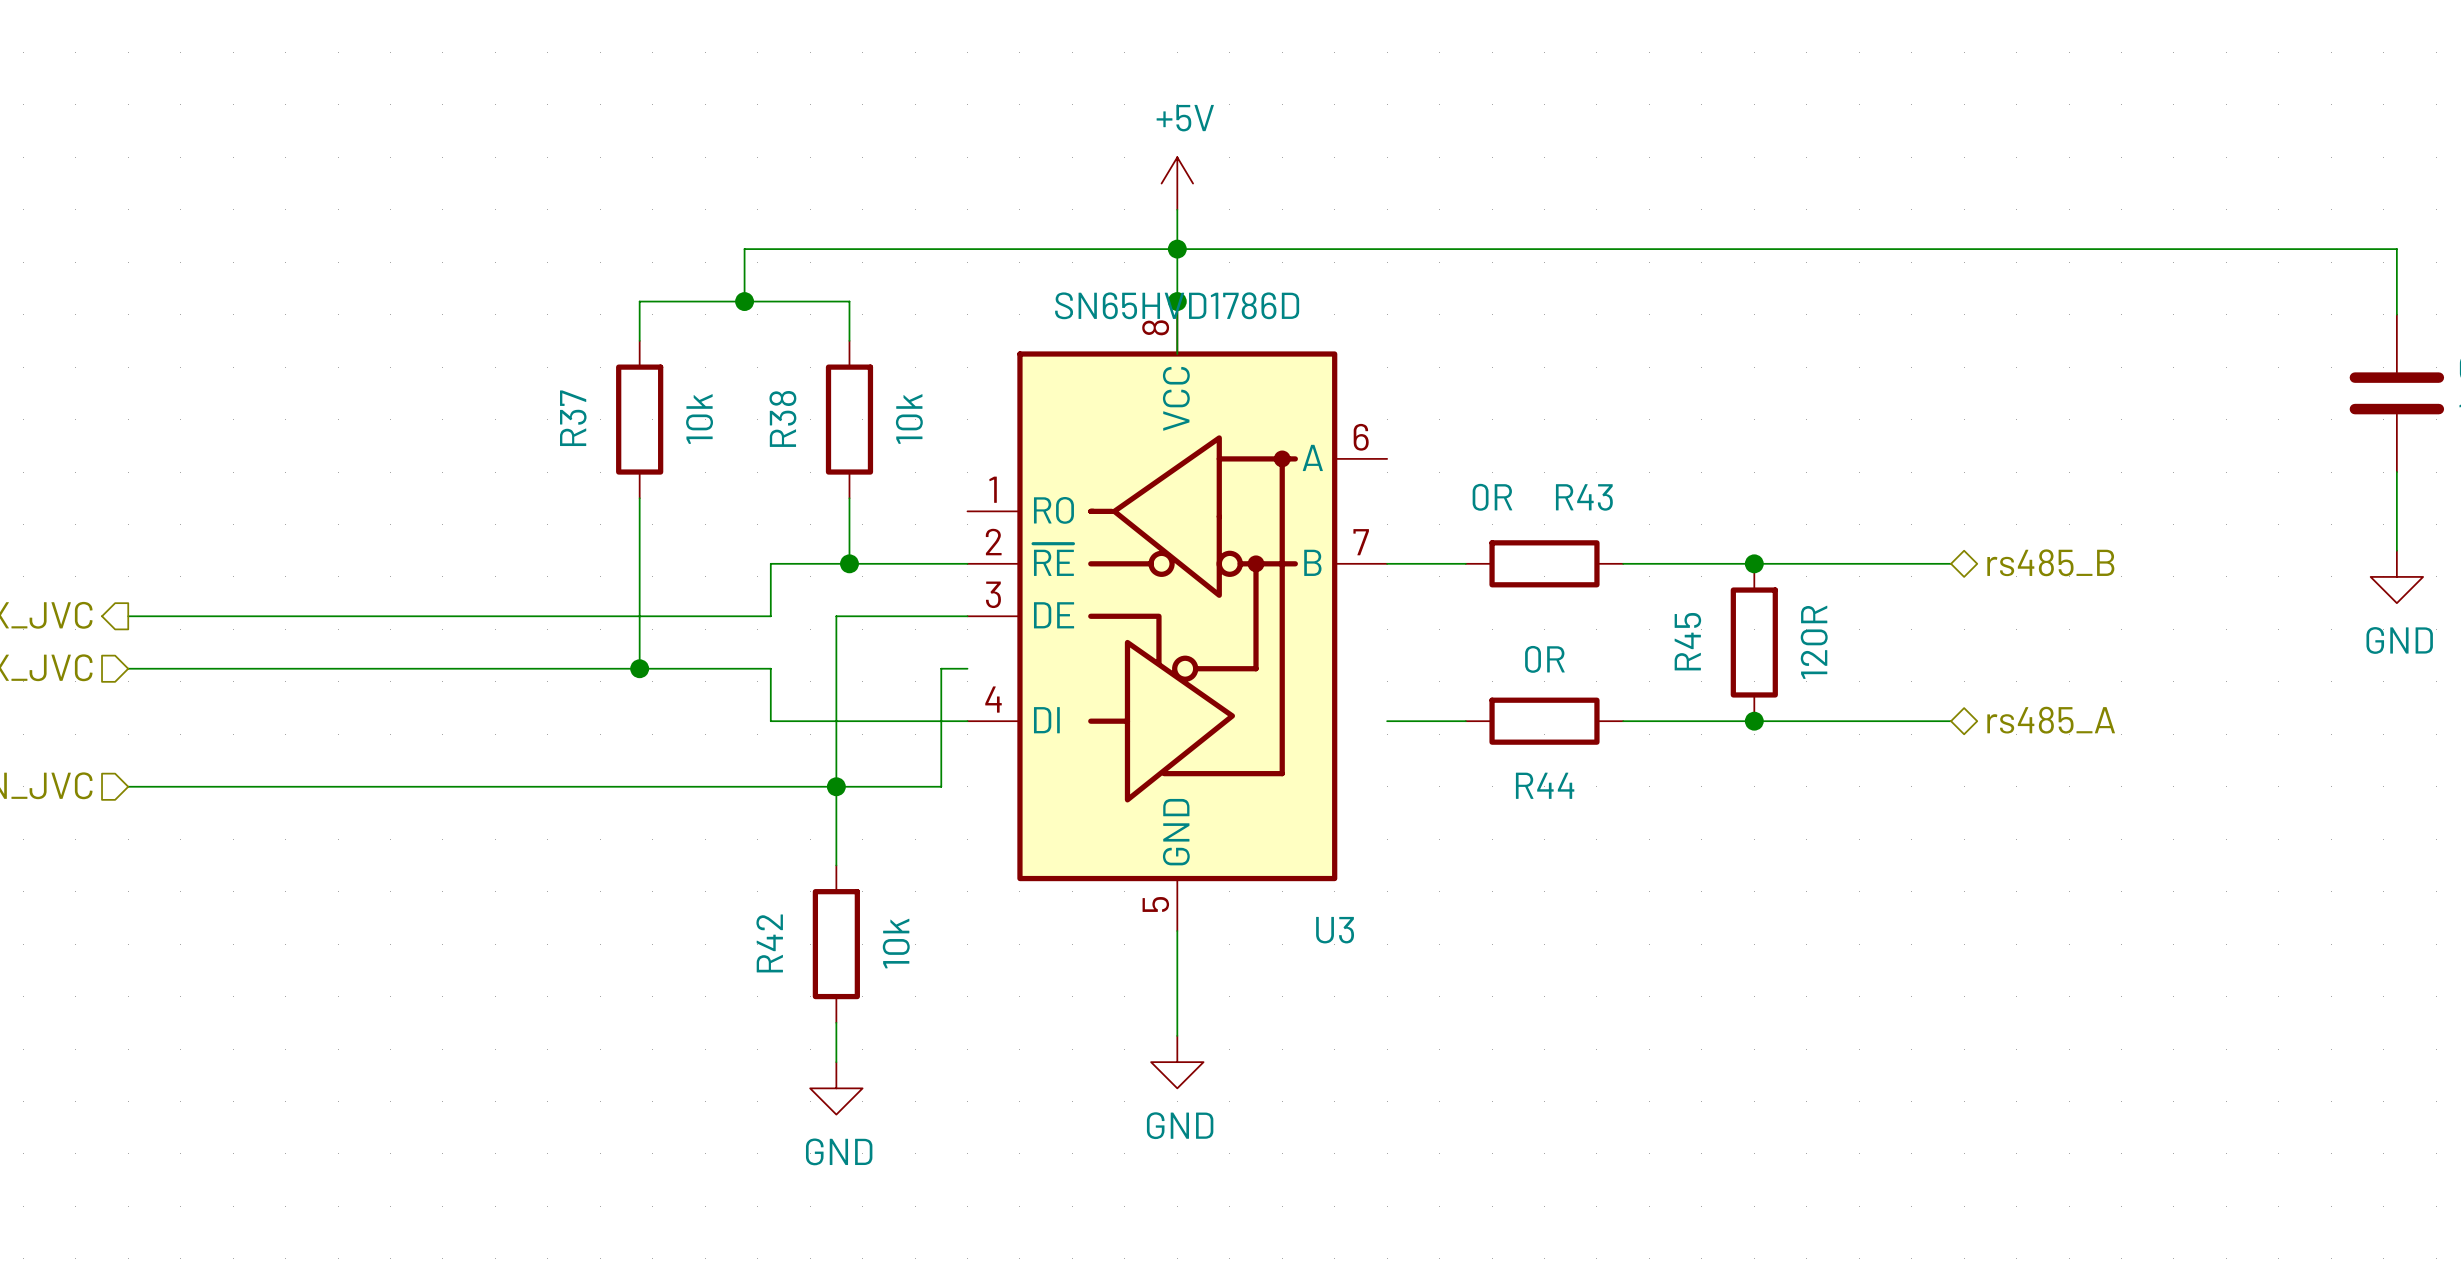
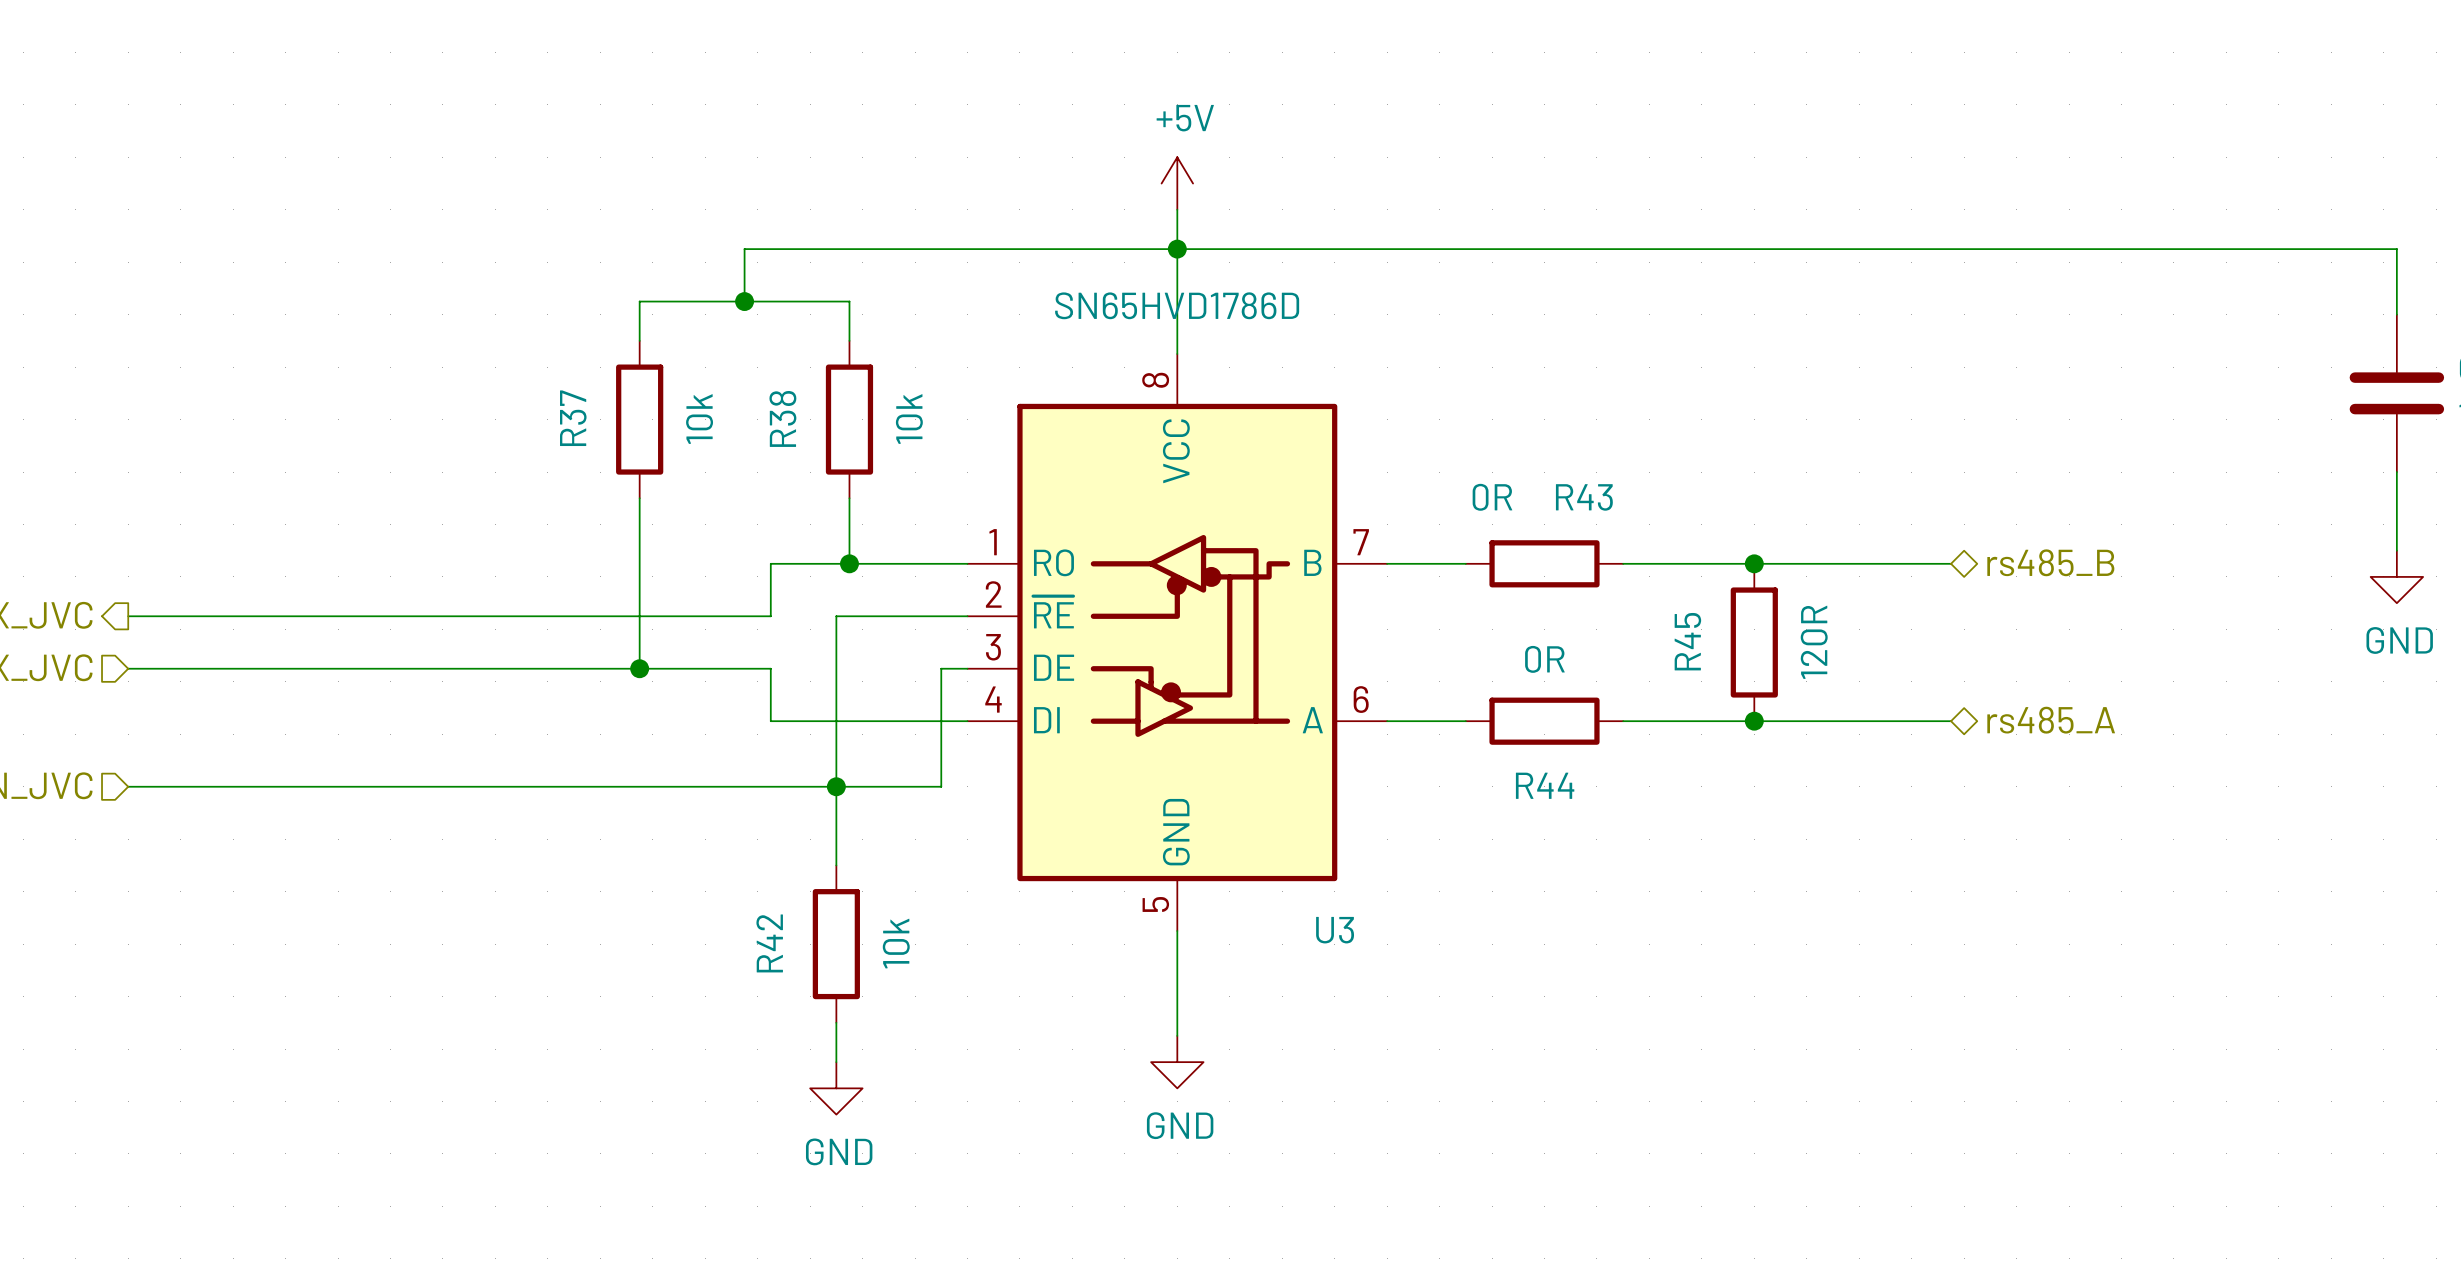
U3 symbol: [967, 301, 1388, 932] -> [967, 354, 1388, 932]
junction: (1177, 301) -> none

